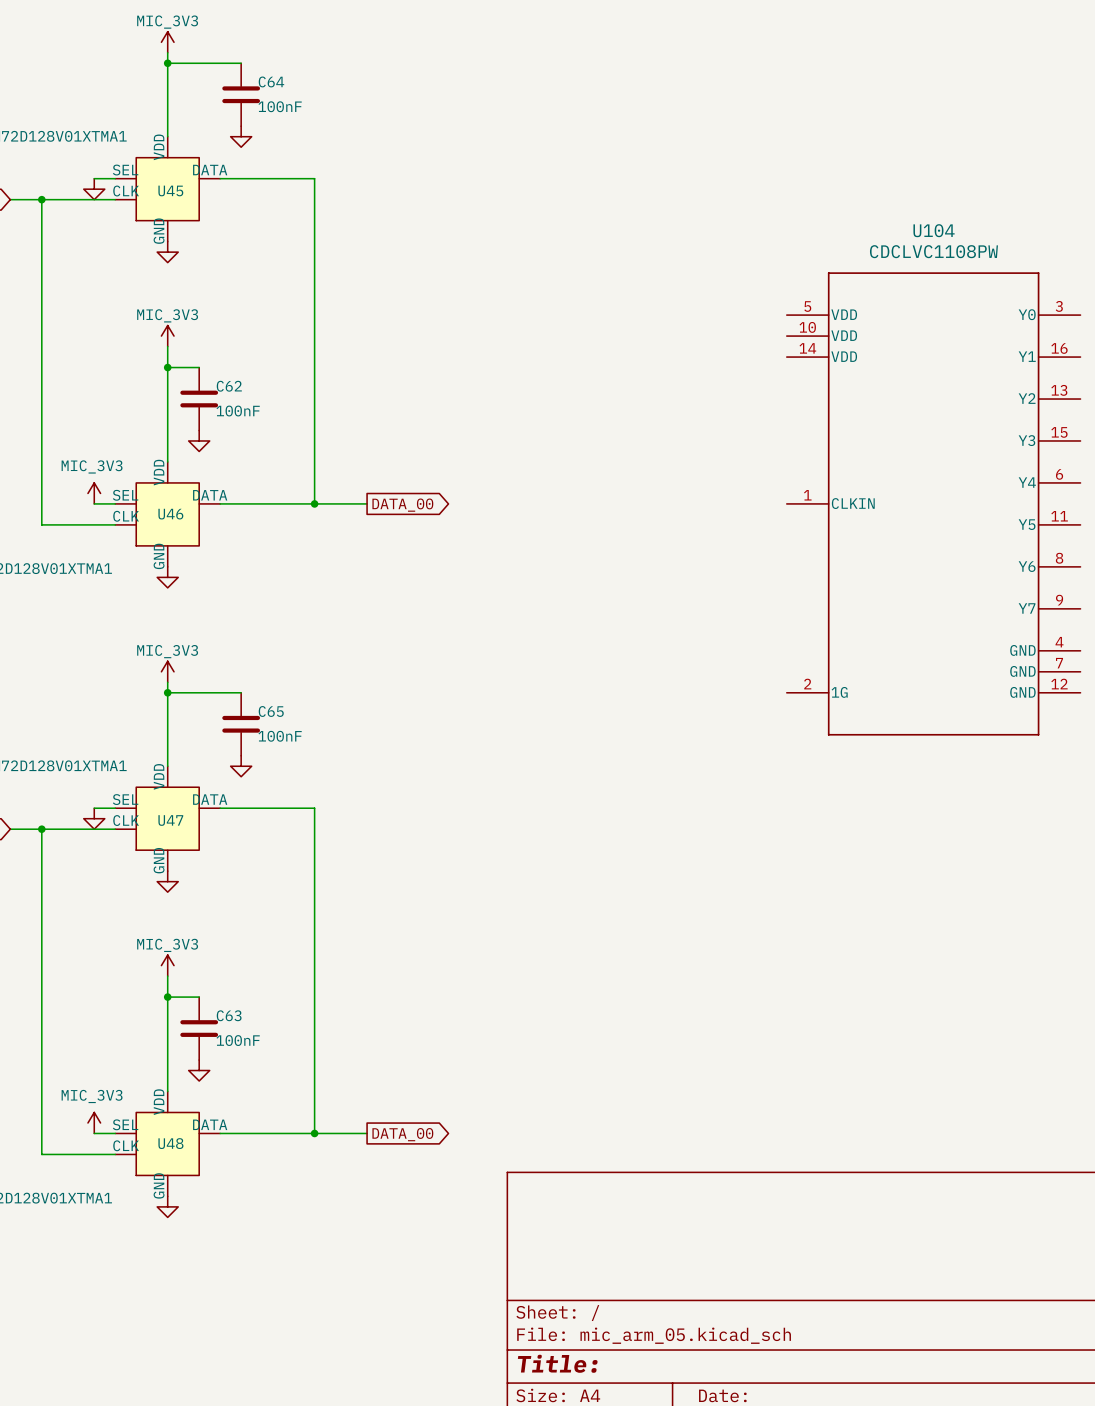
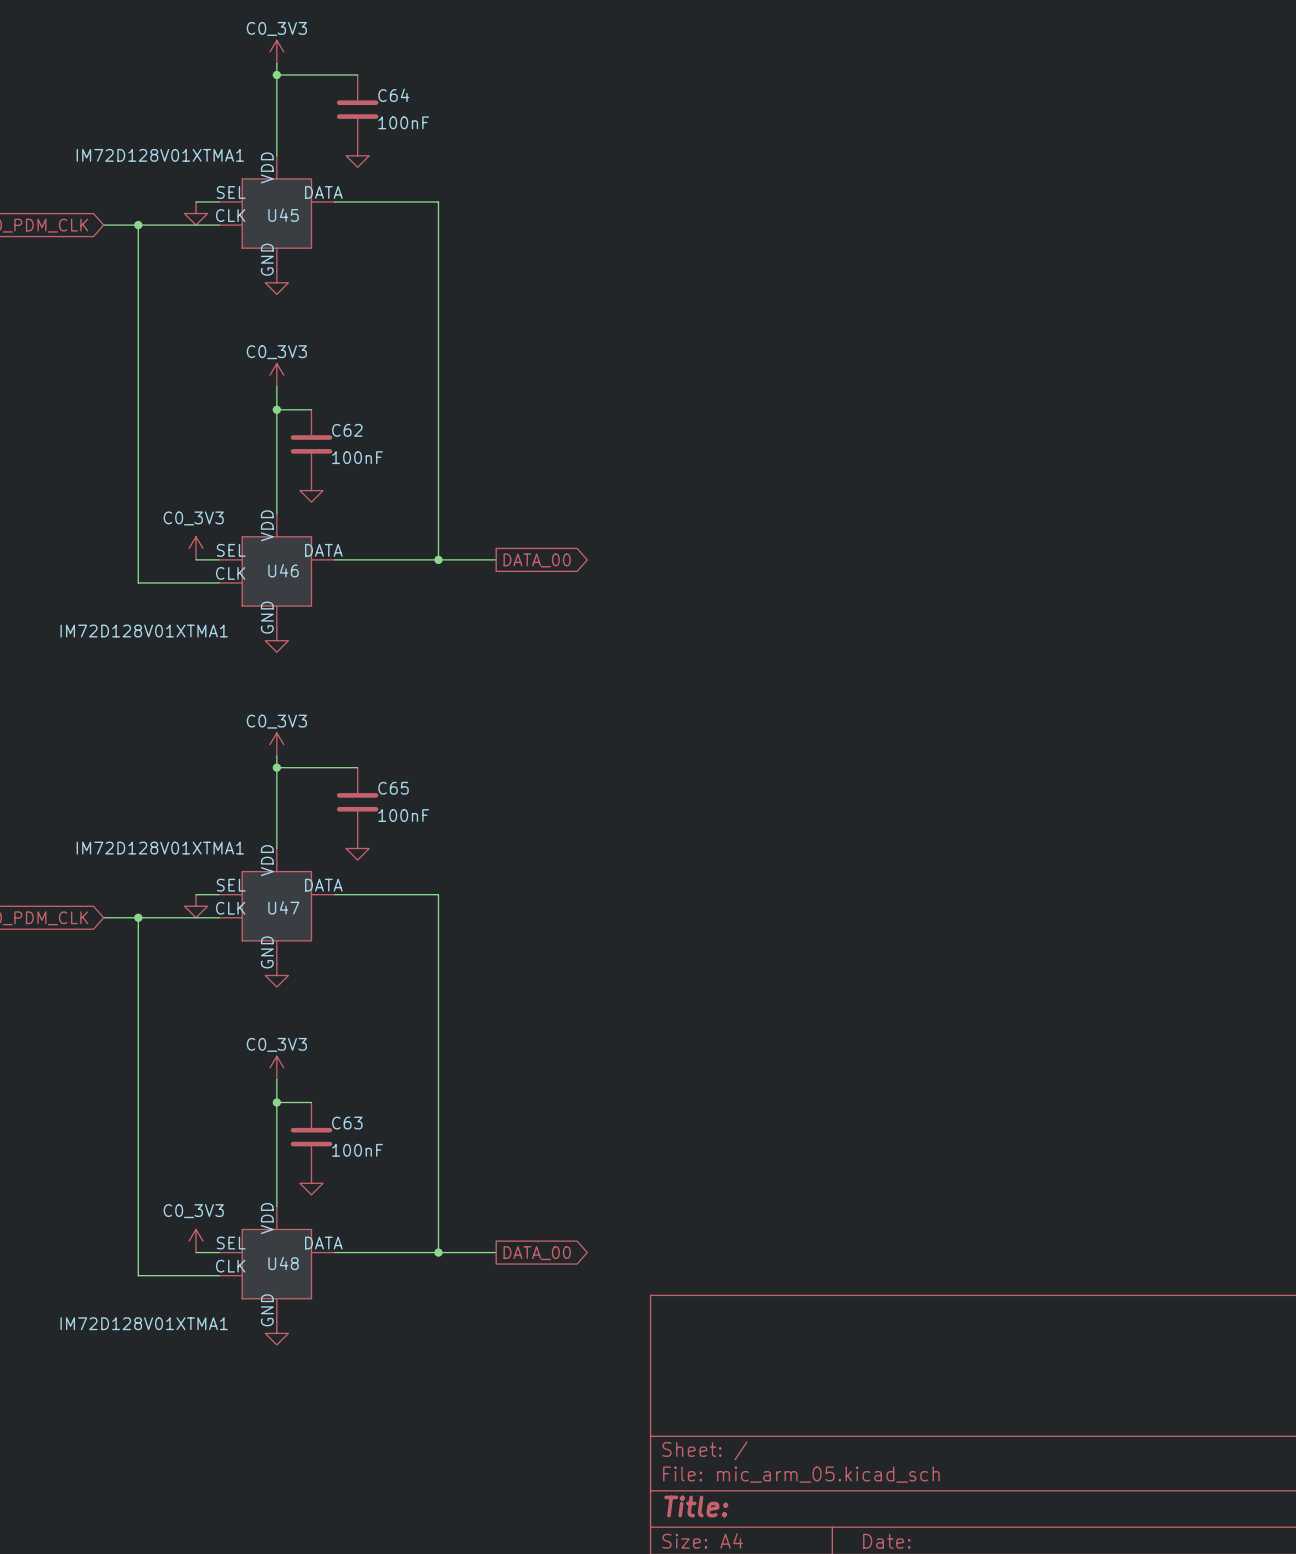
power symbol: MIC_3V3 (167, 42) -> C0_3V3 (276, 51)
power symbol: MIC_3V3 (167, 336) -> C0_3V3 (276, 375)
power symbol: MIC_3V3 (94, 493) -> C0_3V3 (196, 548)
U104: CDCLVC1108PW (933, 503) -> none
power symbol: MIC_3V3 (167, 671) -> C0_3V3 (276, 744)
power symbol: MIC_3V3 (167, 965) -> C0_3V3 (276, 1067)
power symbol: MIC_3V3 (94, 1122) -> C0_3V3 (196, 1241)

